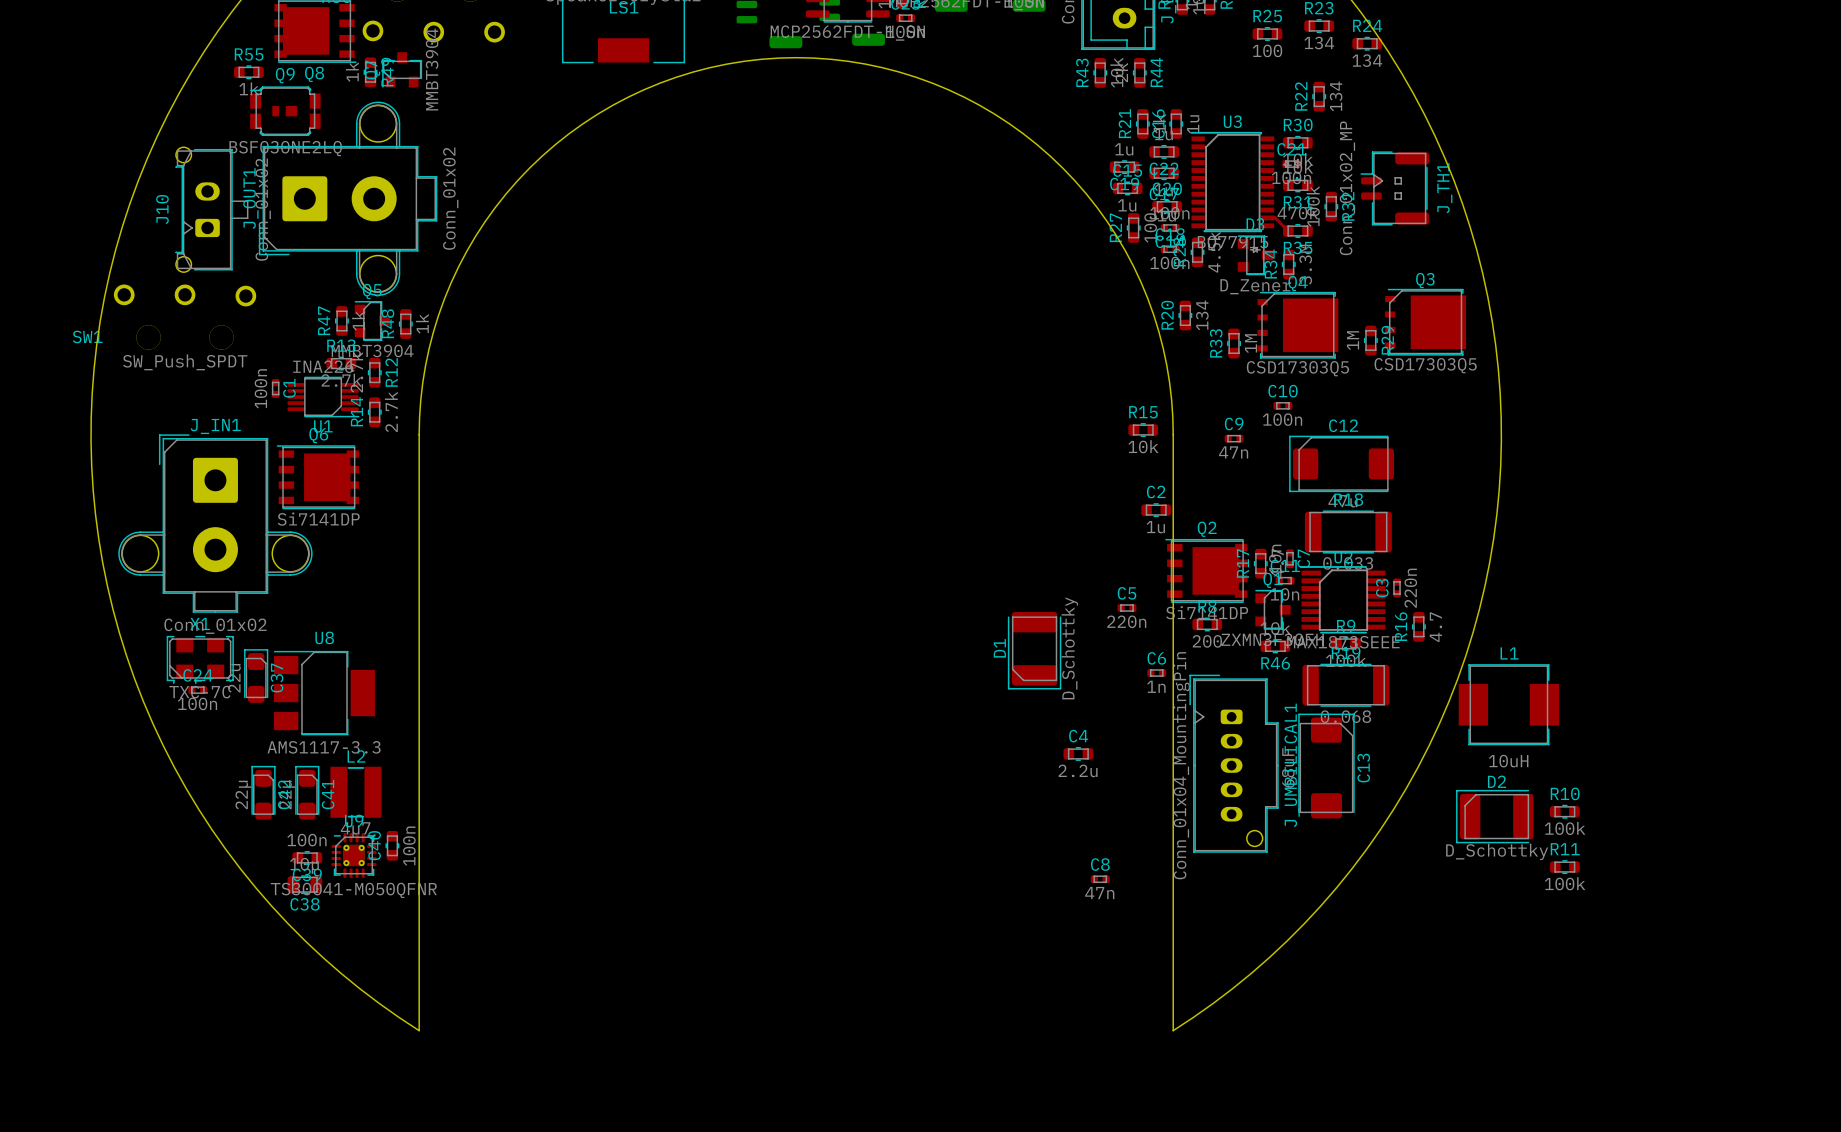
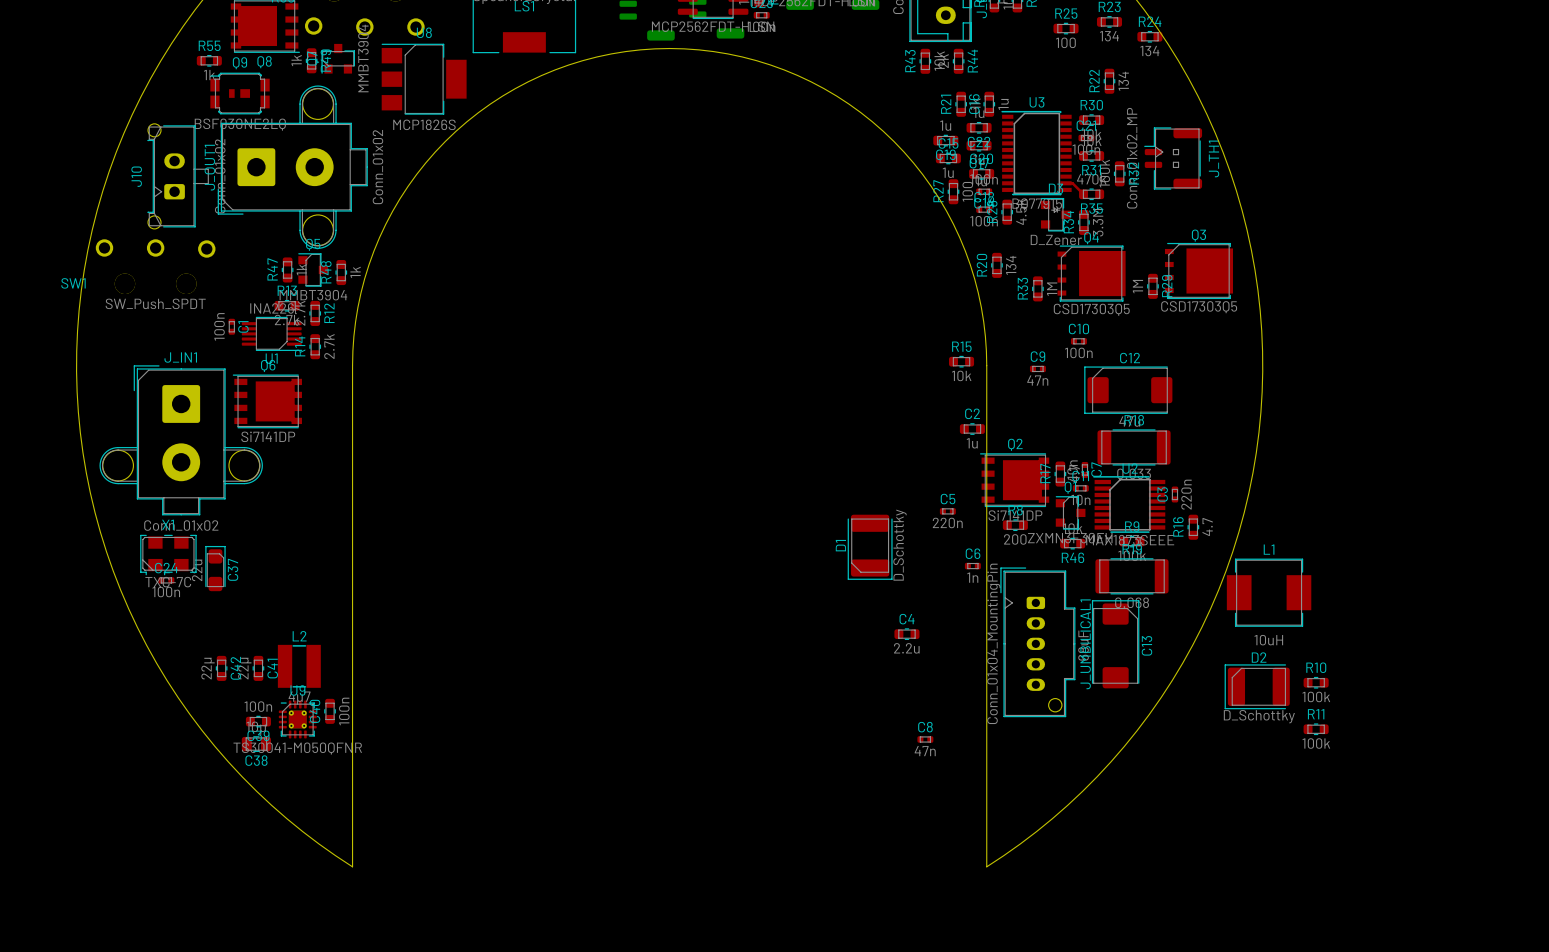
U8 position: (324, 693) -> (424, 79)
U8 value: AMS1117-3.3 (324, 747) -> MCP1826S (424, 124)
C42 footprint: [251, 765, 276, 820] -> [215, 655, 228, 681]
C41 footprint: [295, 765, 320, 820] -> [252, 655, 265, 681]

